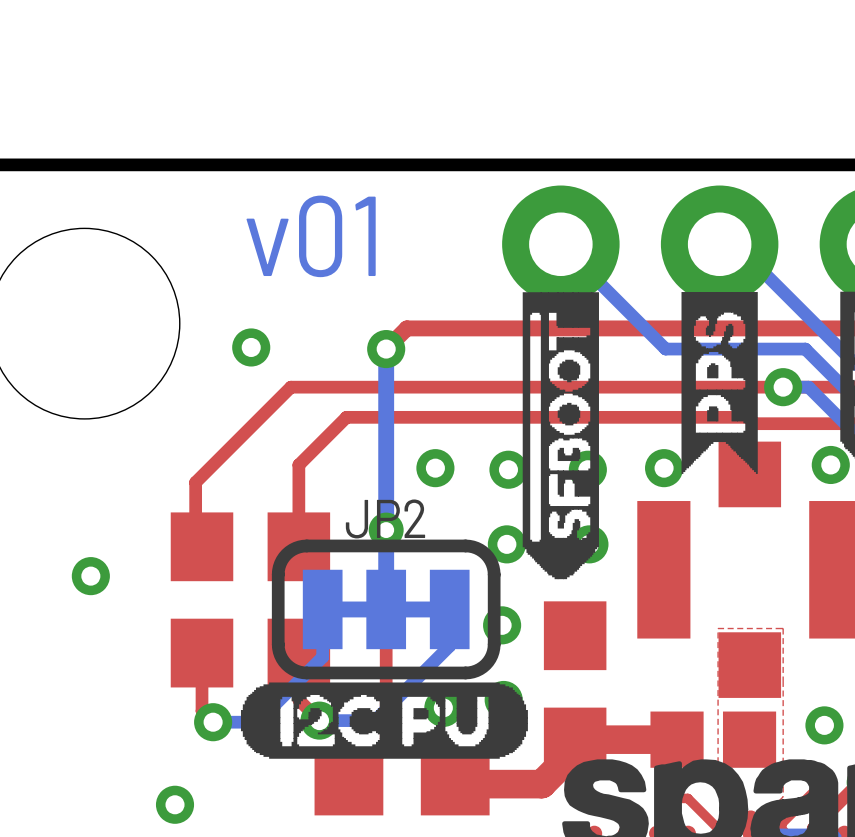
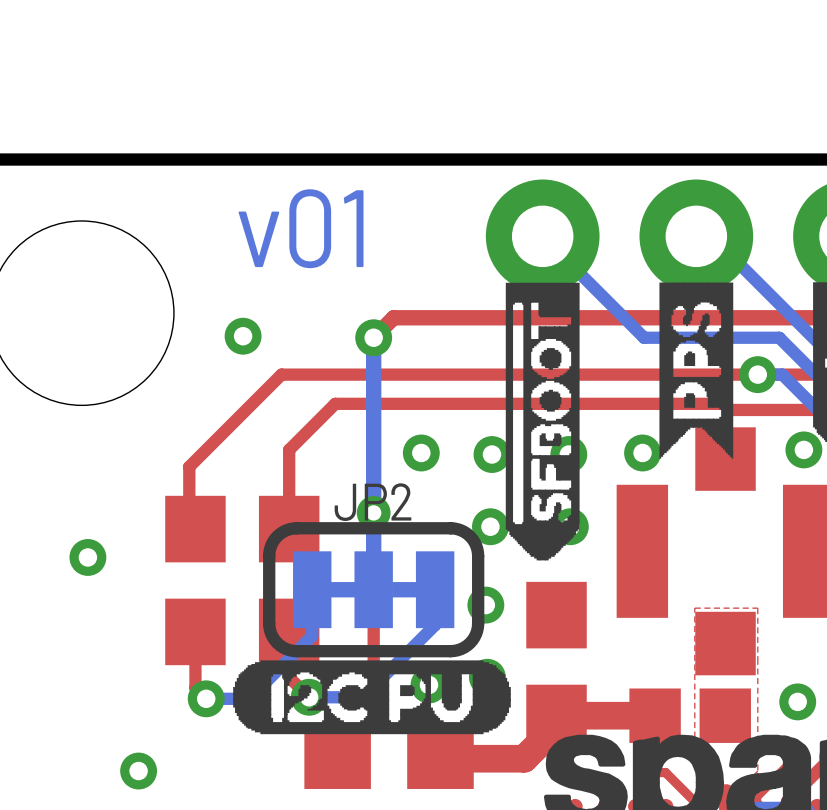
via position: (175, 804) -> (138, 771)

